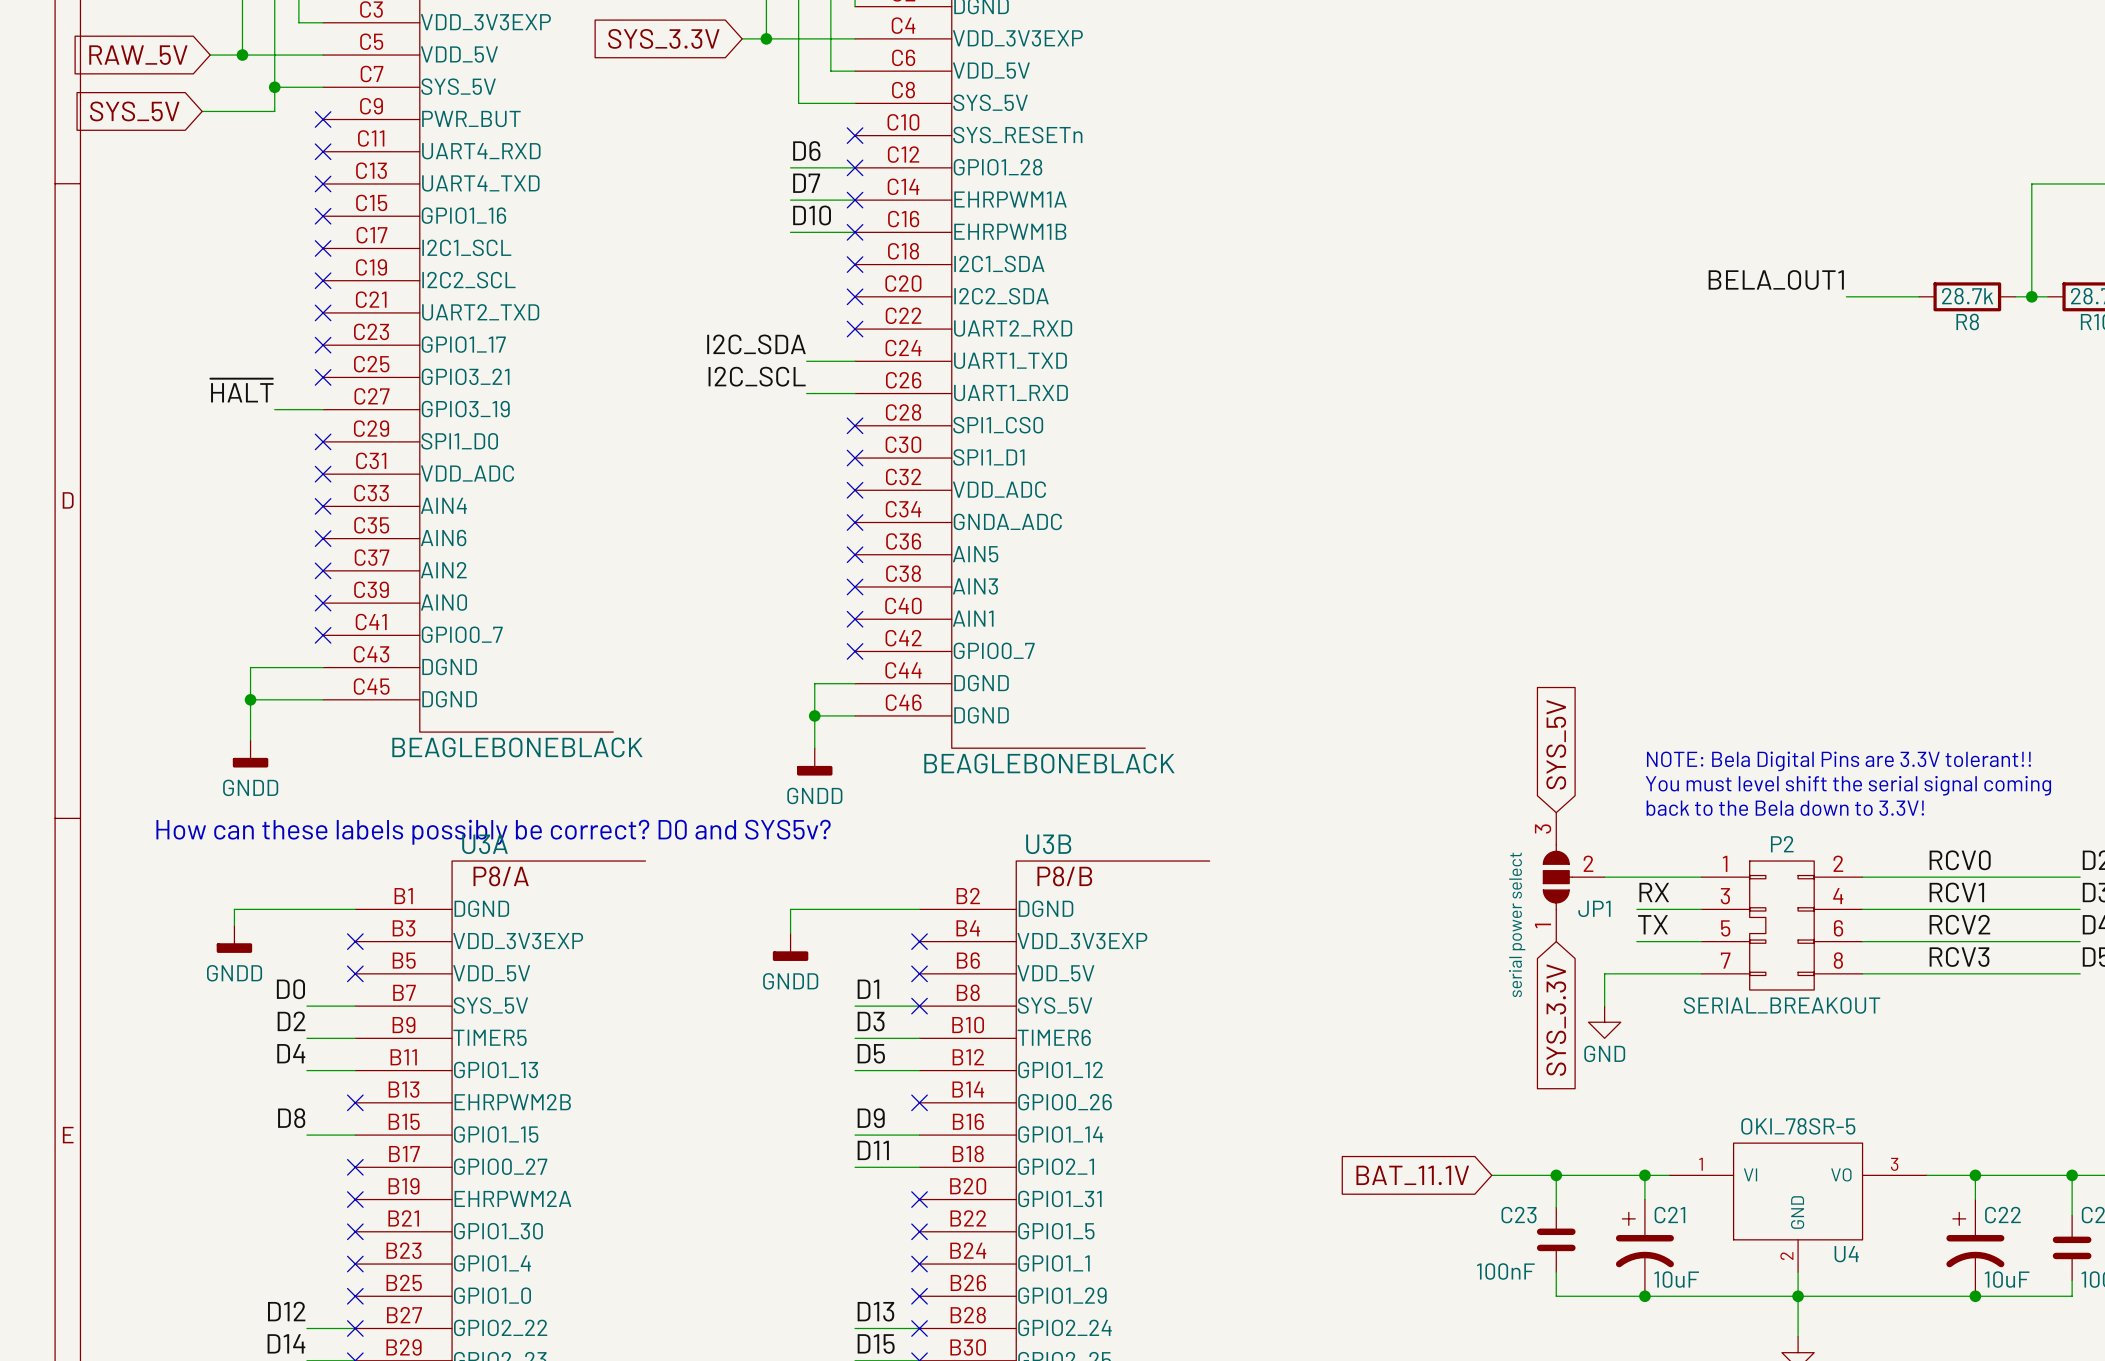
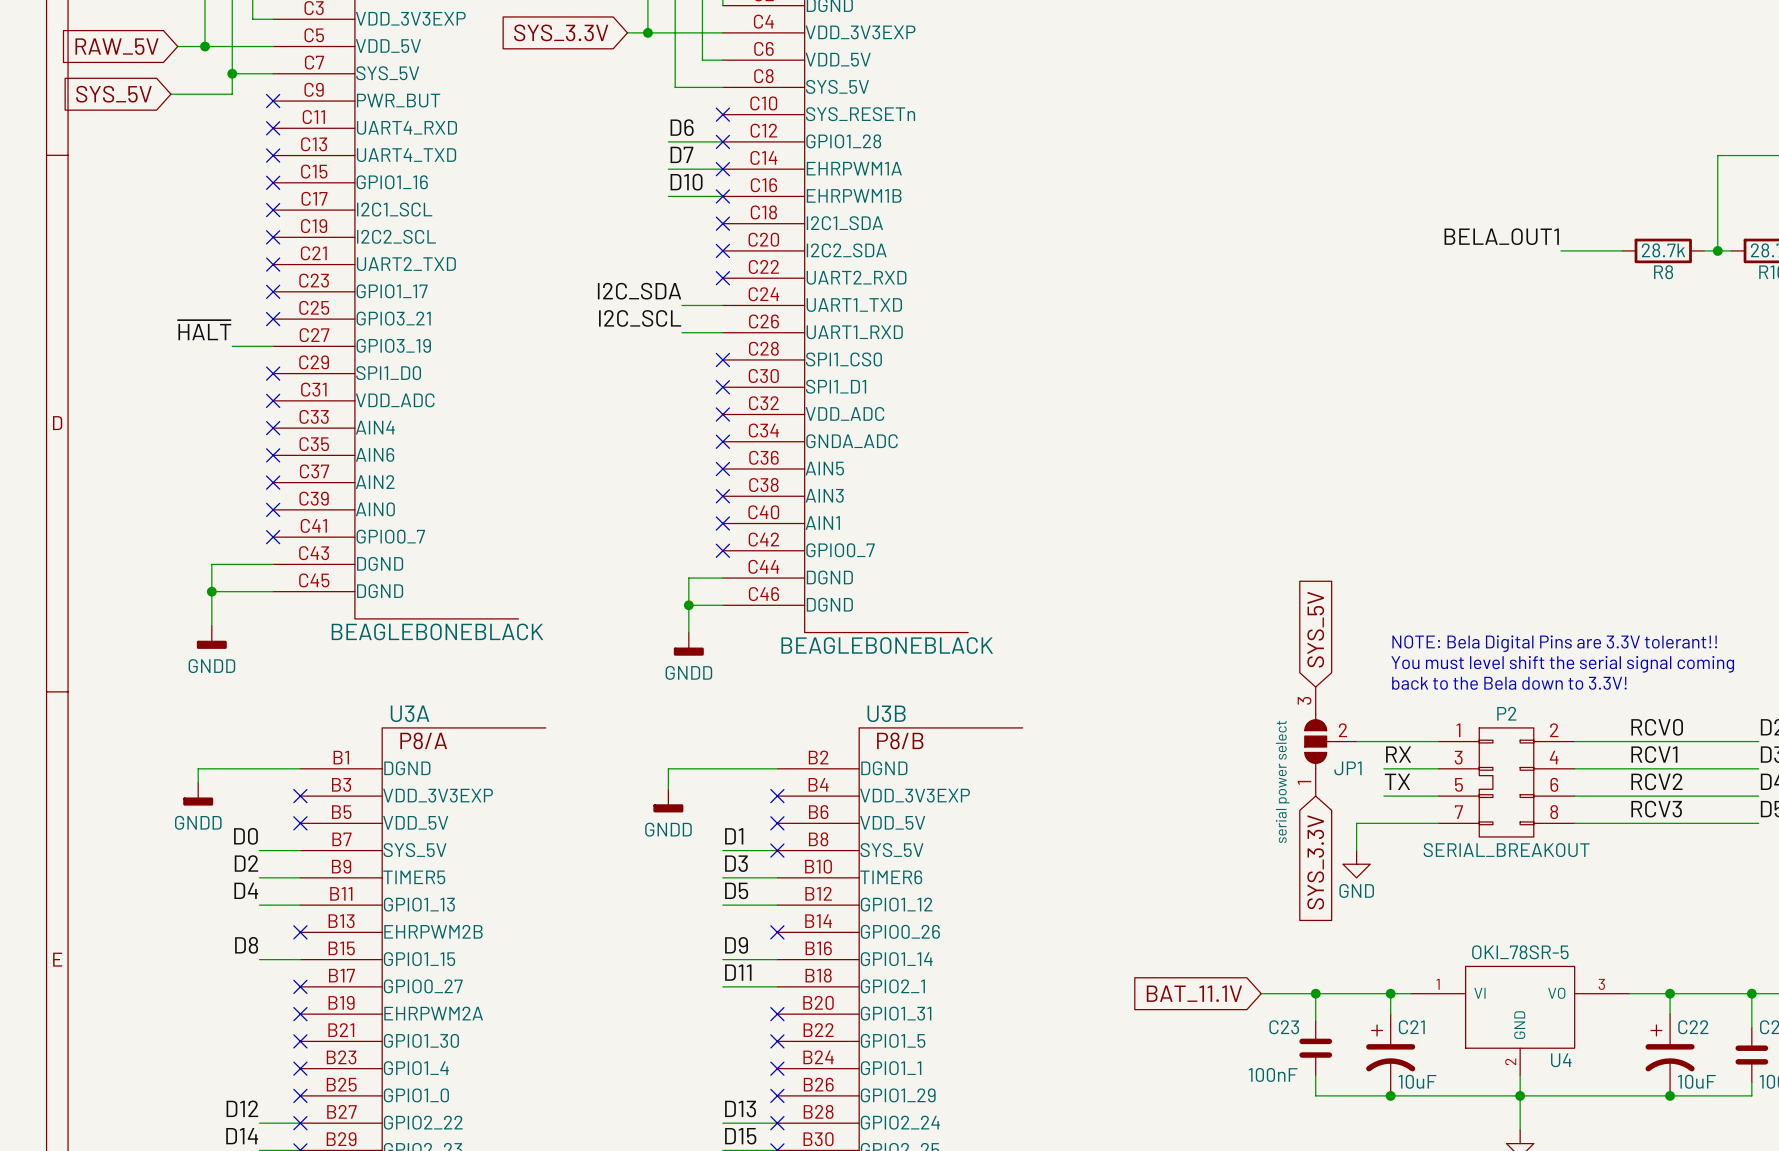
text: How can these labels possibly be correct? D0 and SYS5v? (493, 832) -> none

